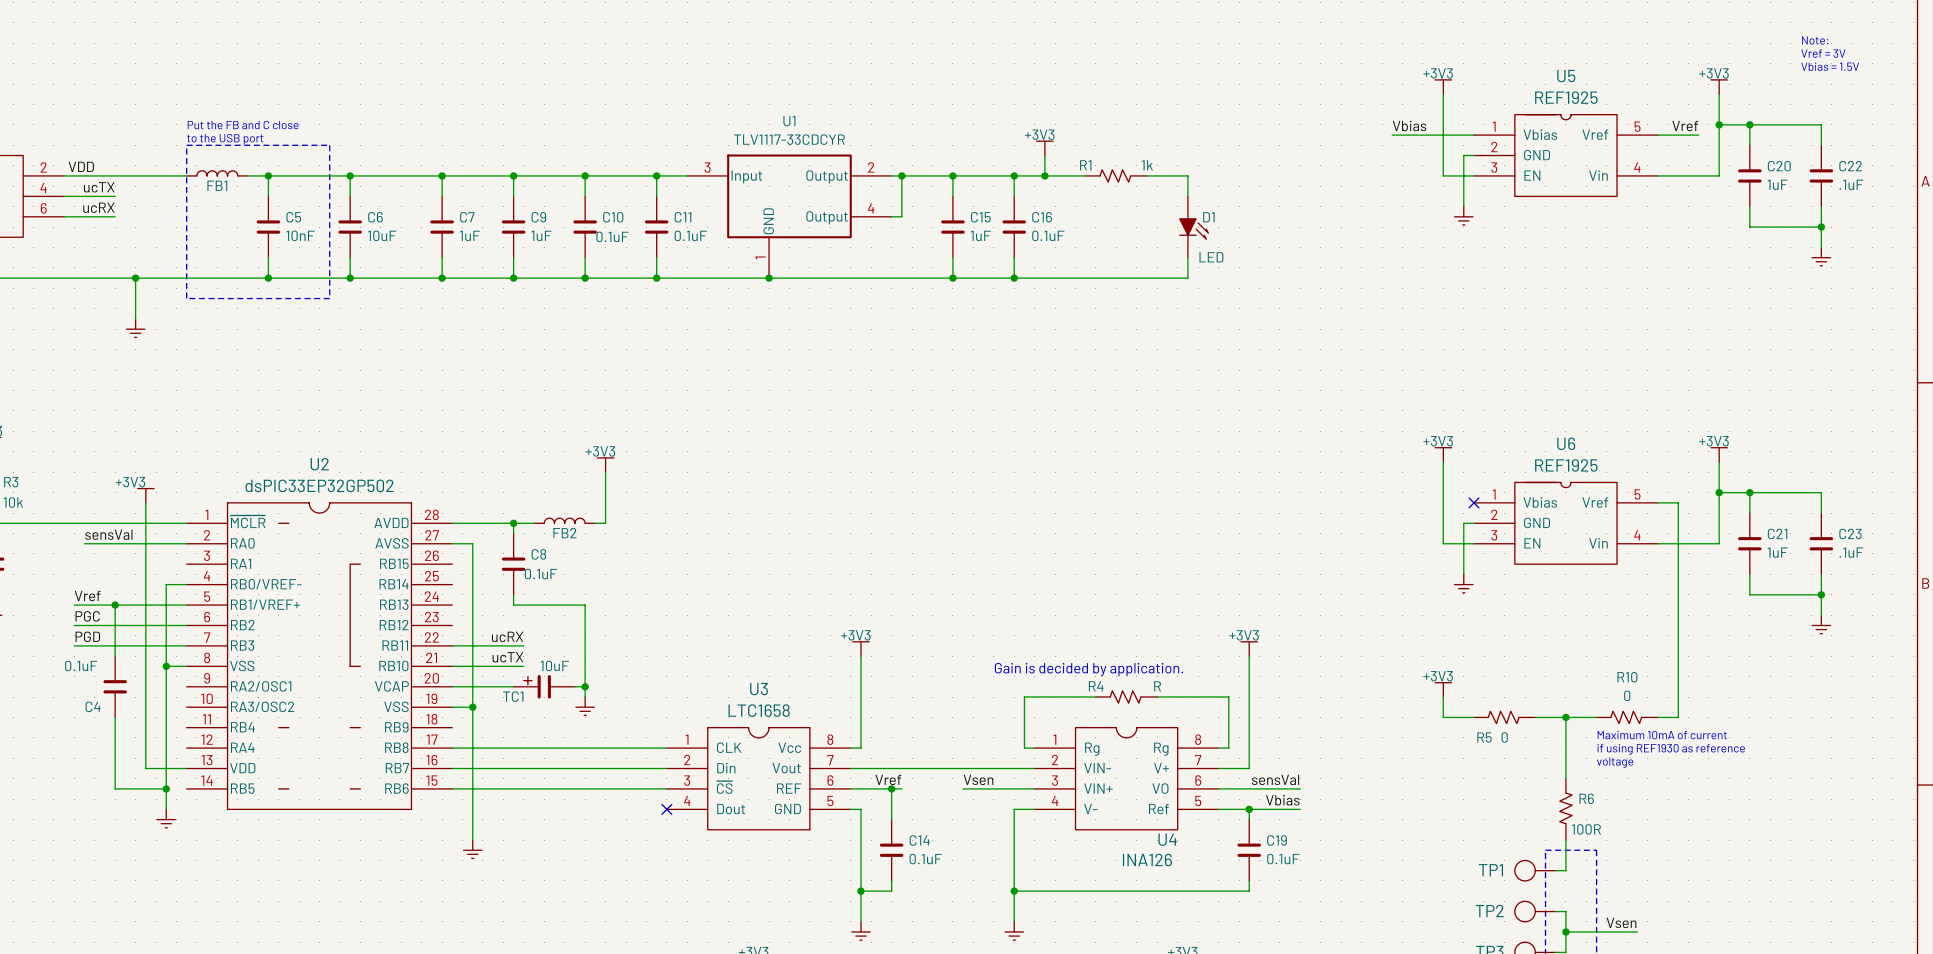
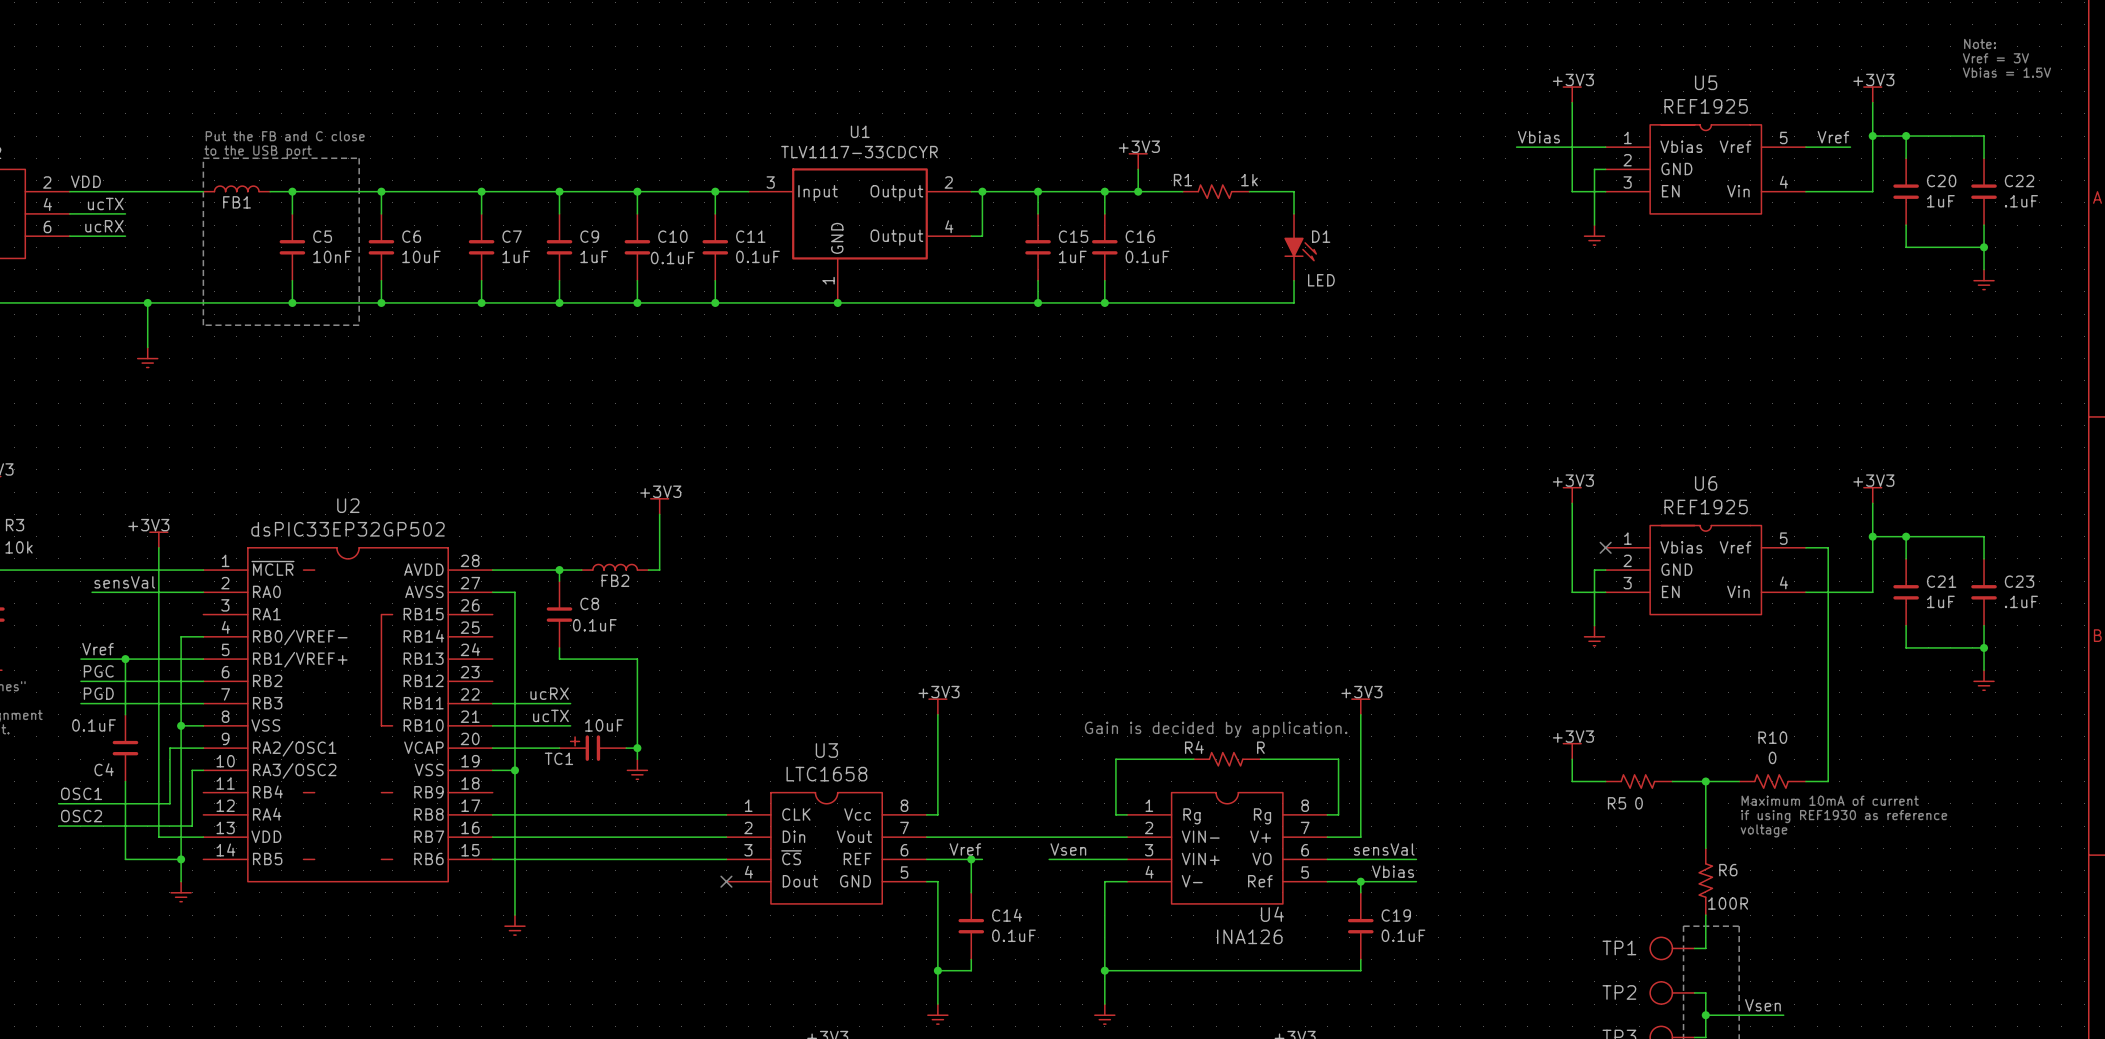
wire: none -> (203, 748) (169, 748) (169, 803) (58, 803)
wire: none -> (203, 770) (192, 770) (192, 826) (58, 826)
label: none -> OSC1 (81, 793)
label: none -> OSC2 (81, 816)

